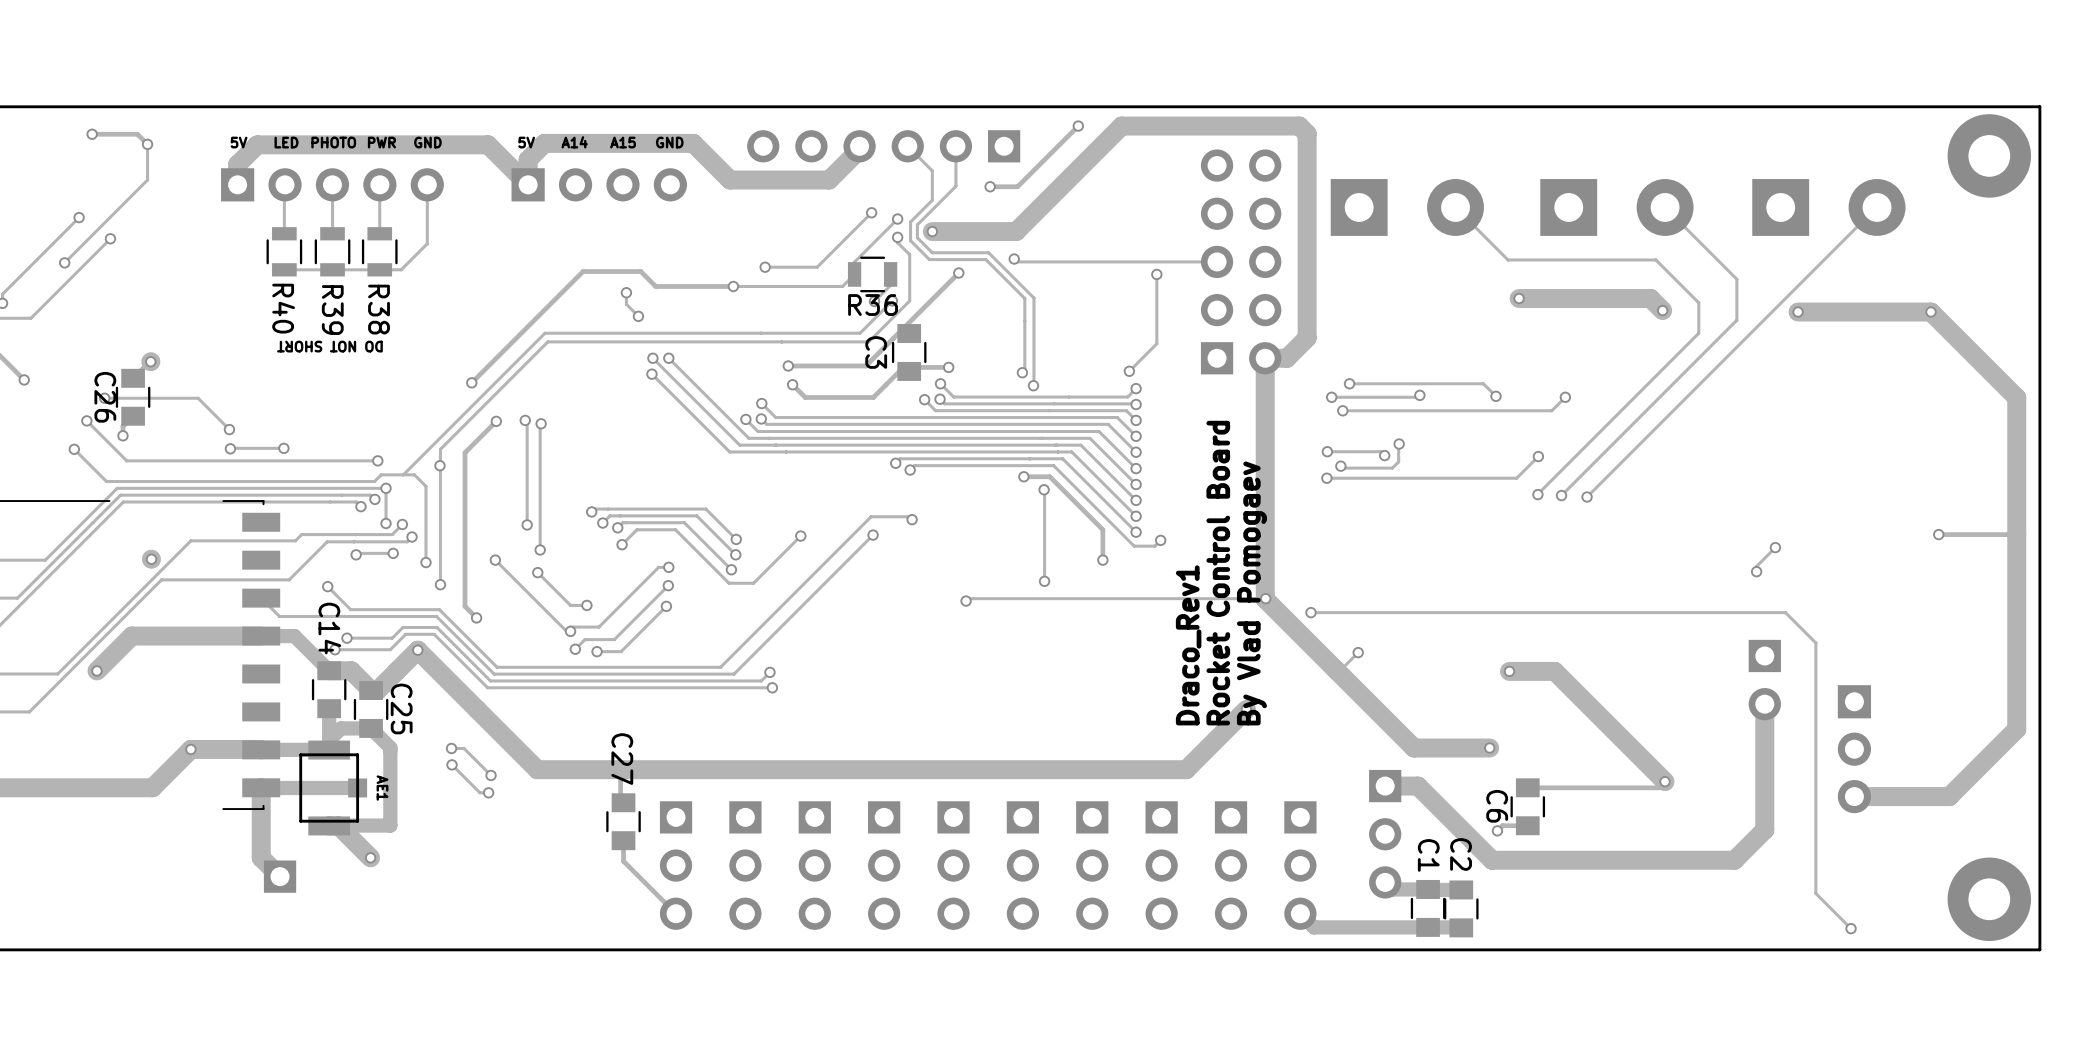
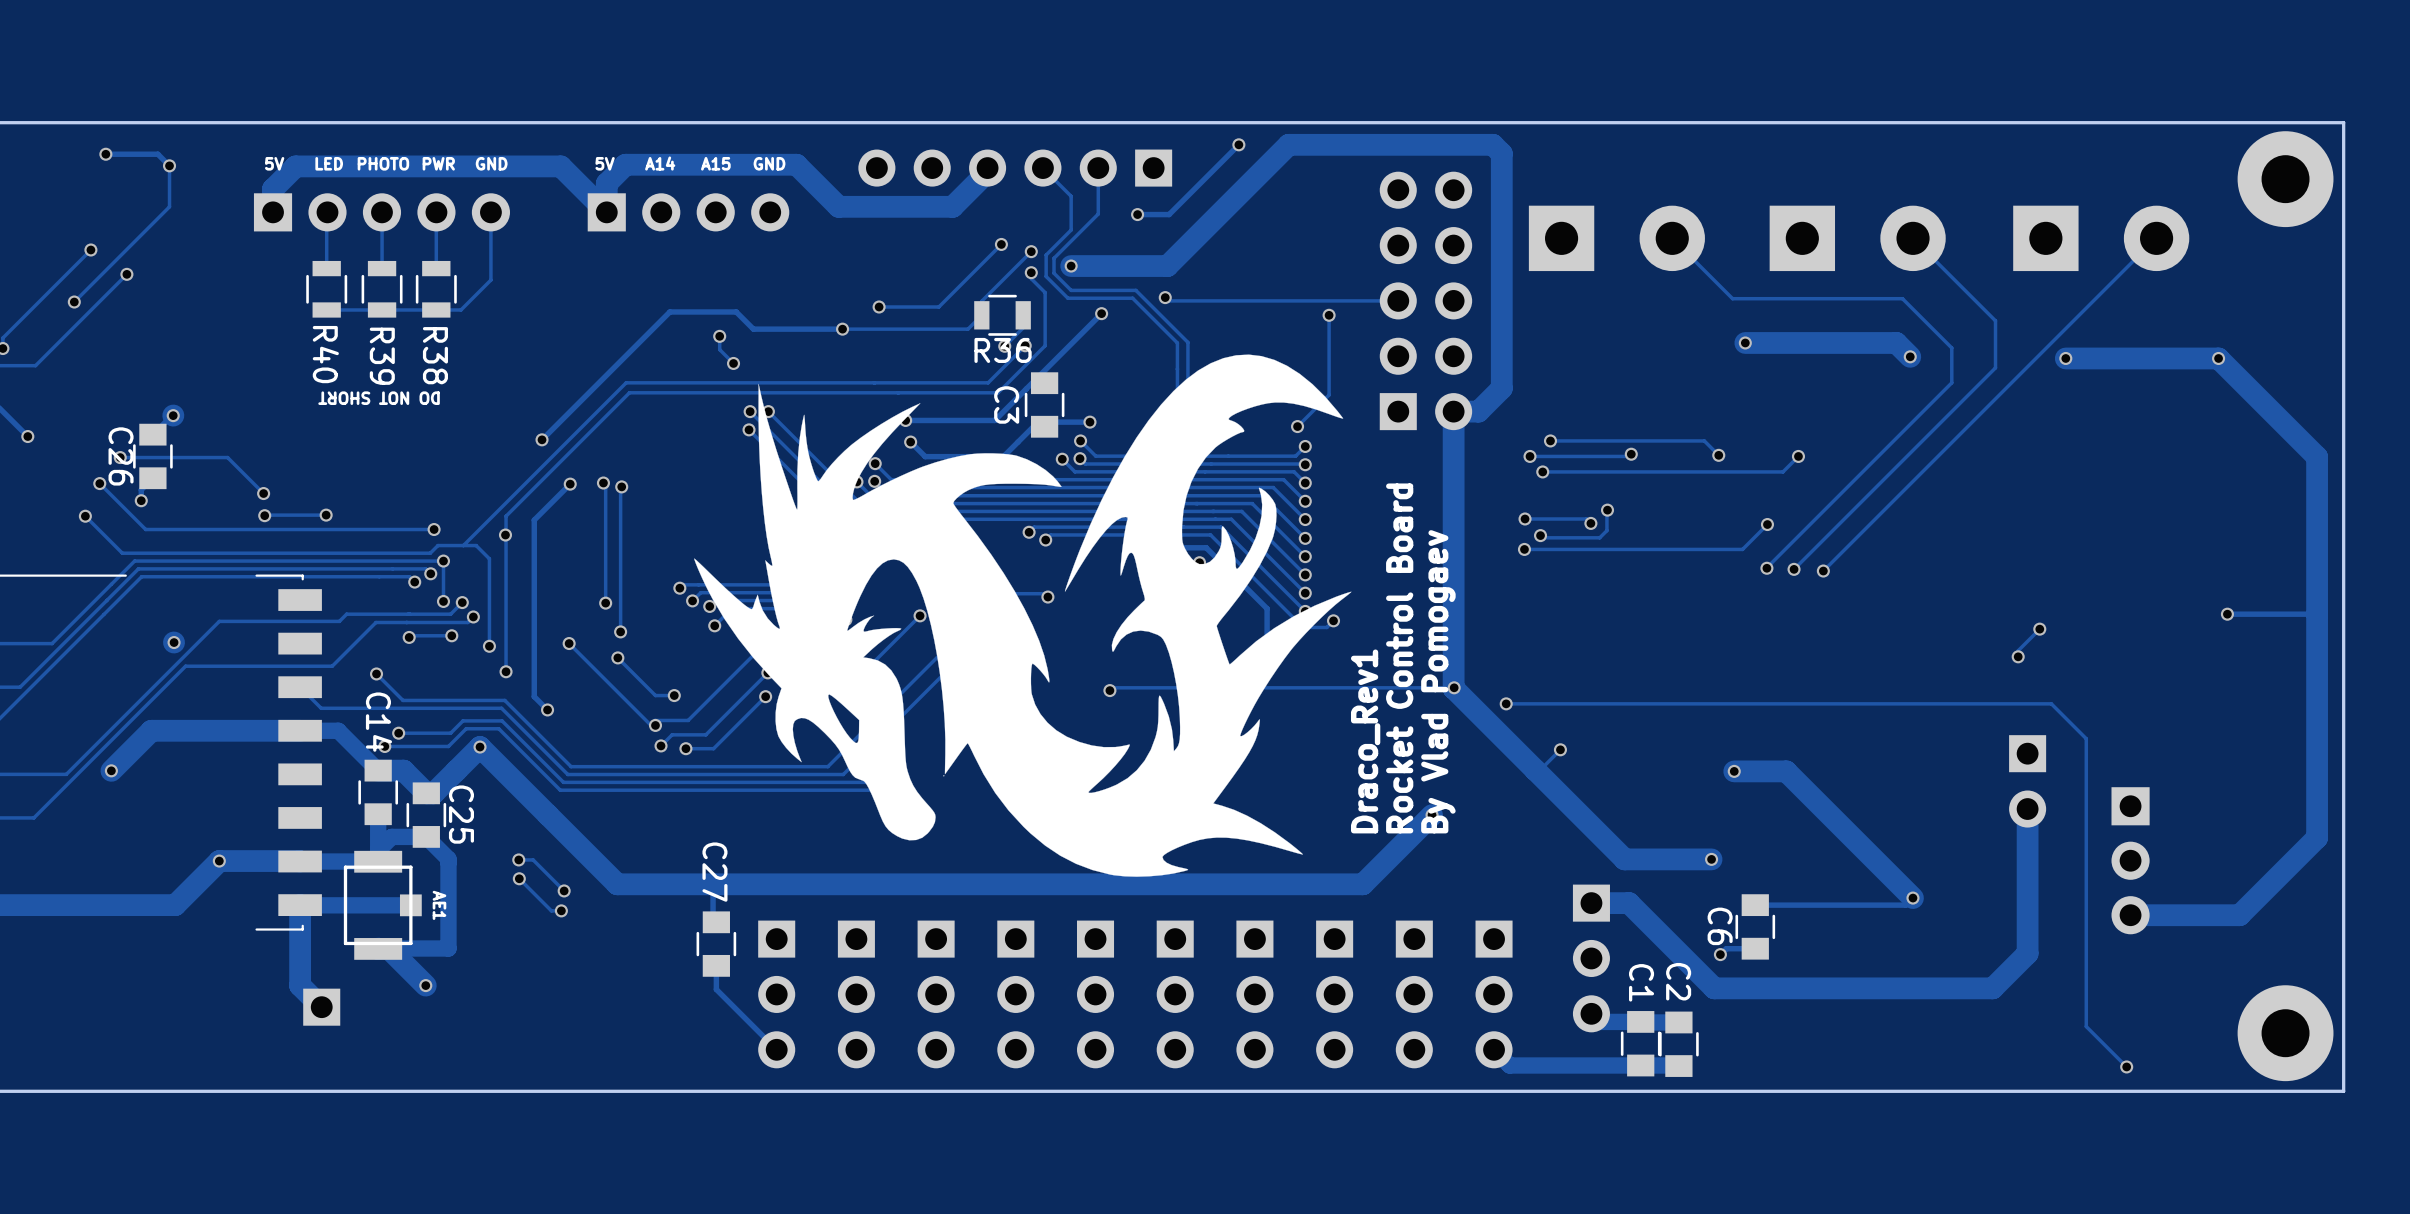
drawing: none -> [694, 354, 1352, 877]

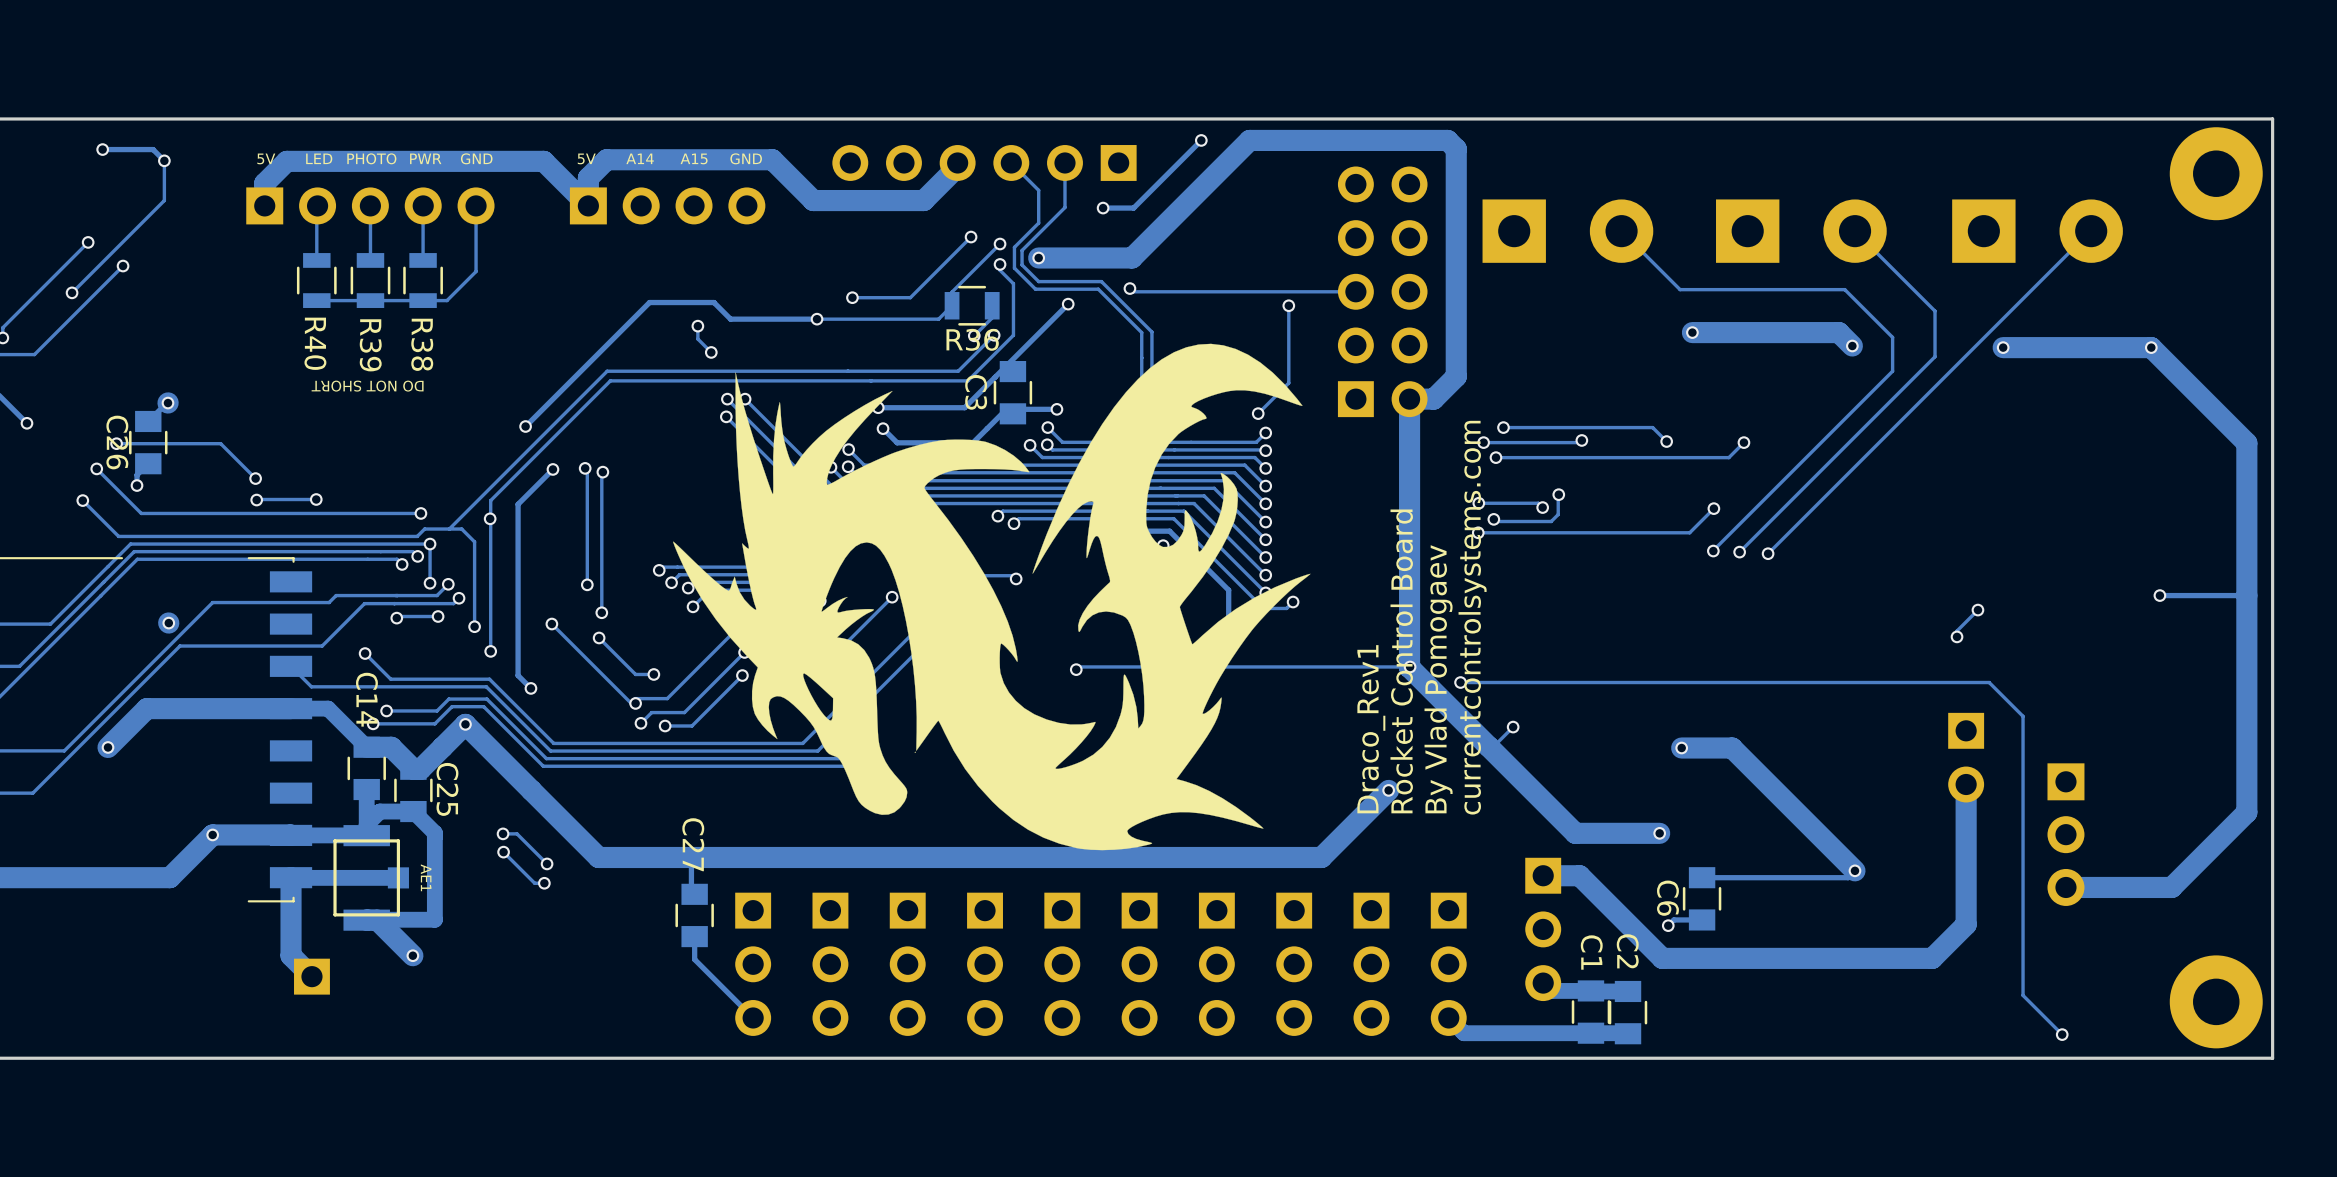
text: none -> currentcontrolsystems.com (1472, 617)
text: Rocket Control Board (1399, 658) -> Draco_Rev1 (1371, 729)
text: By Vlad Pomogaev (1438, 681) -> Rocket Control Board (1401, 661)
text: none -> By Vlad Pomogaev (1438, 679)
text: Draco_Rev1 (1365, 741) -> none

